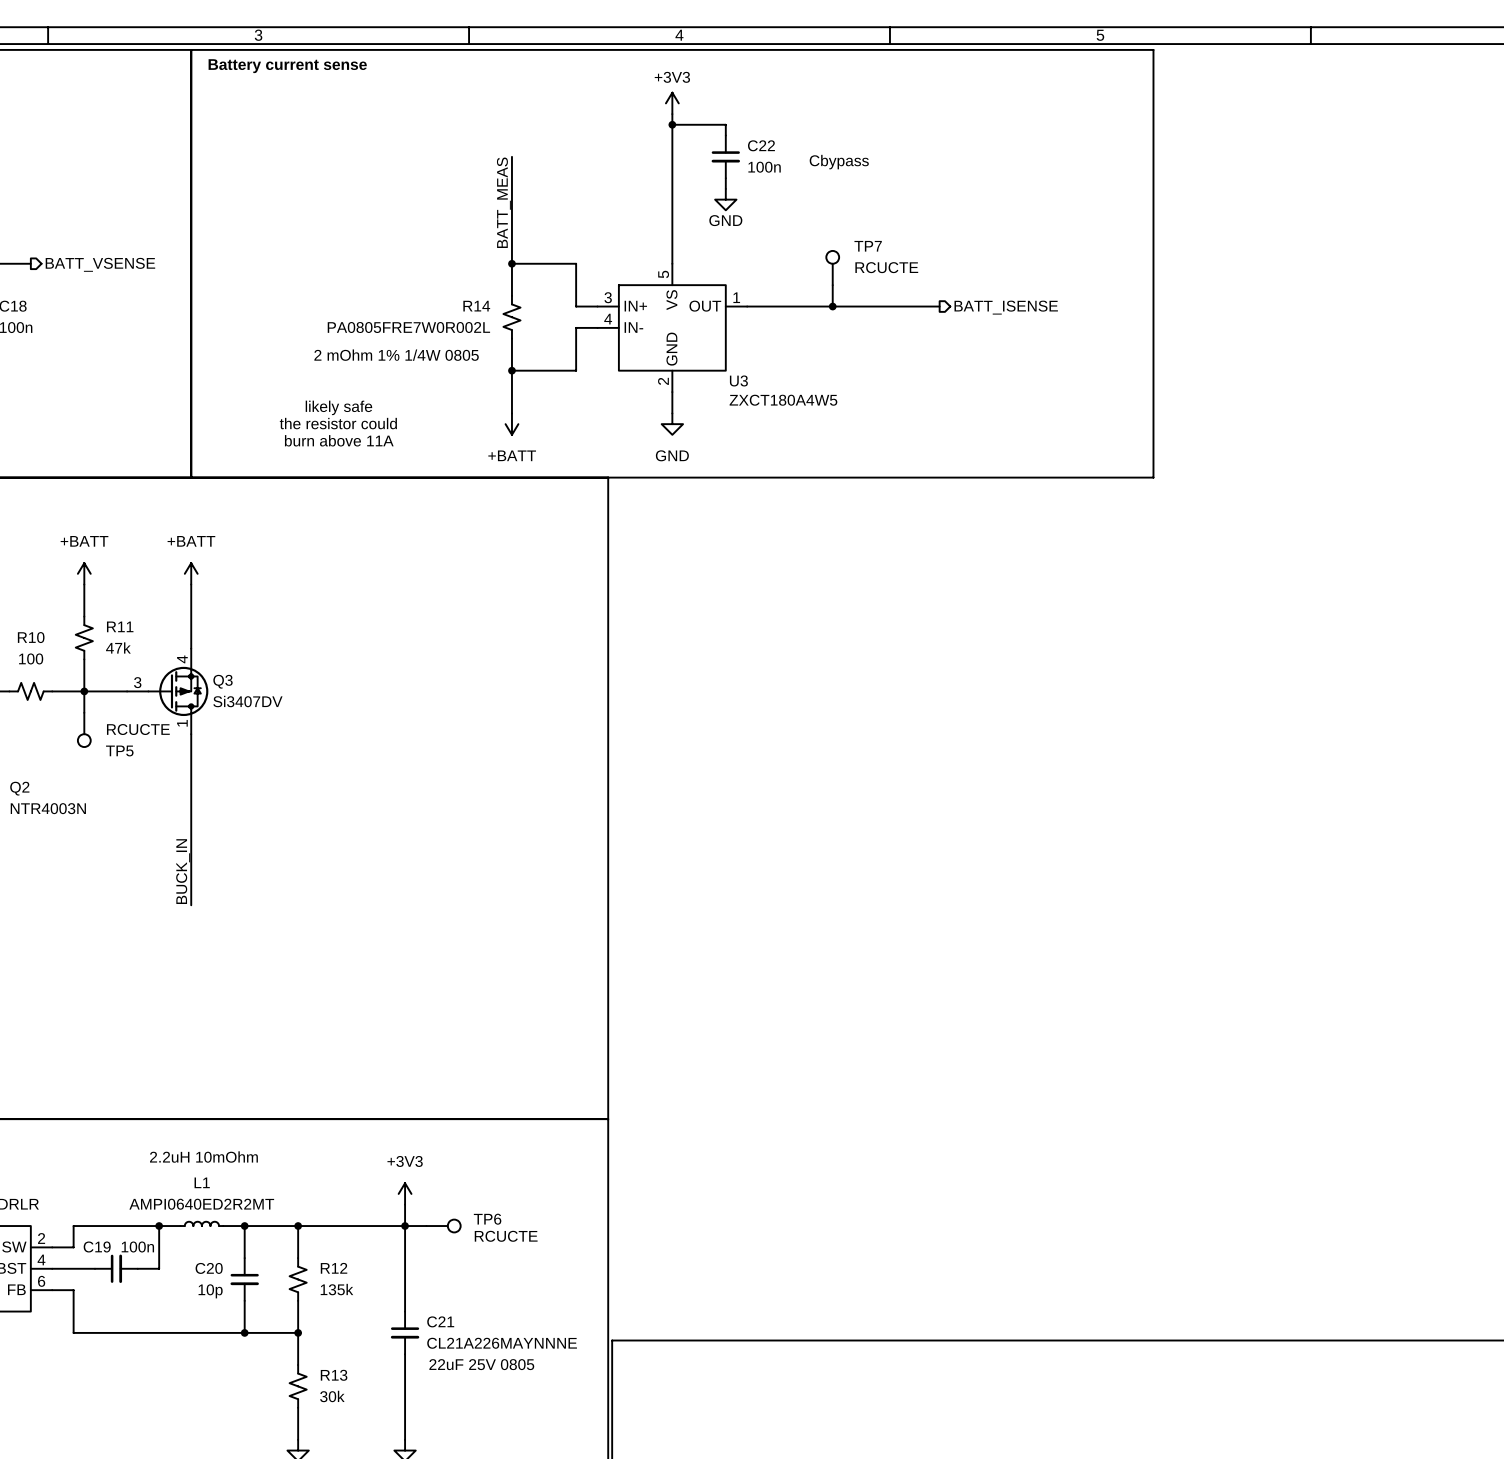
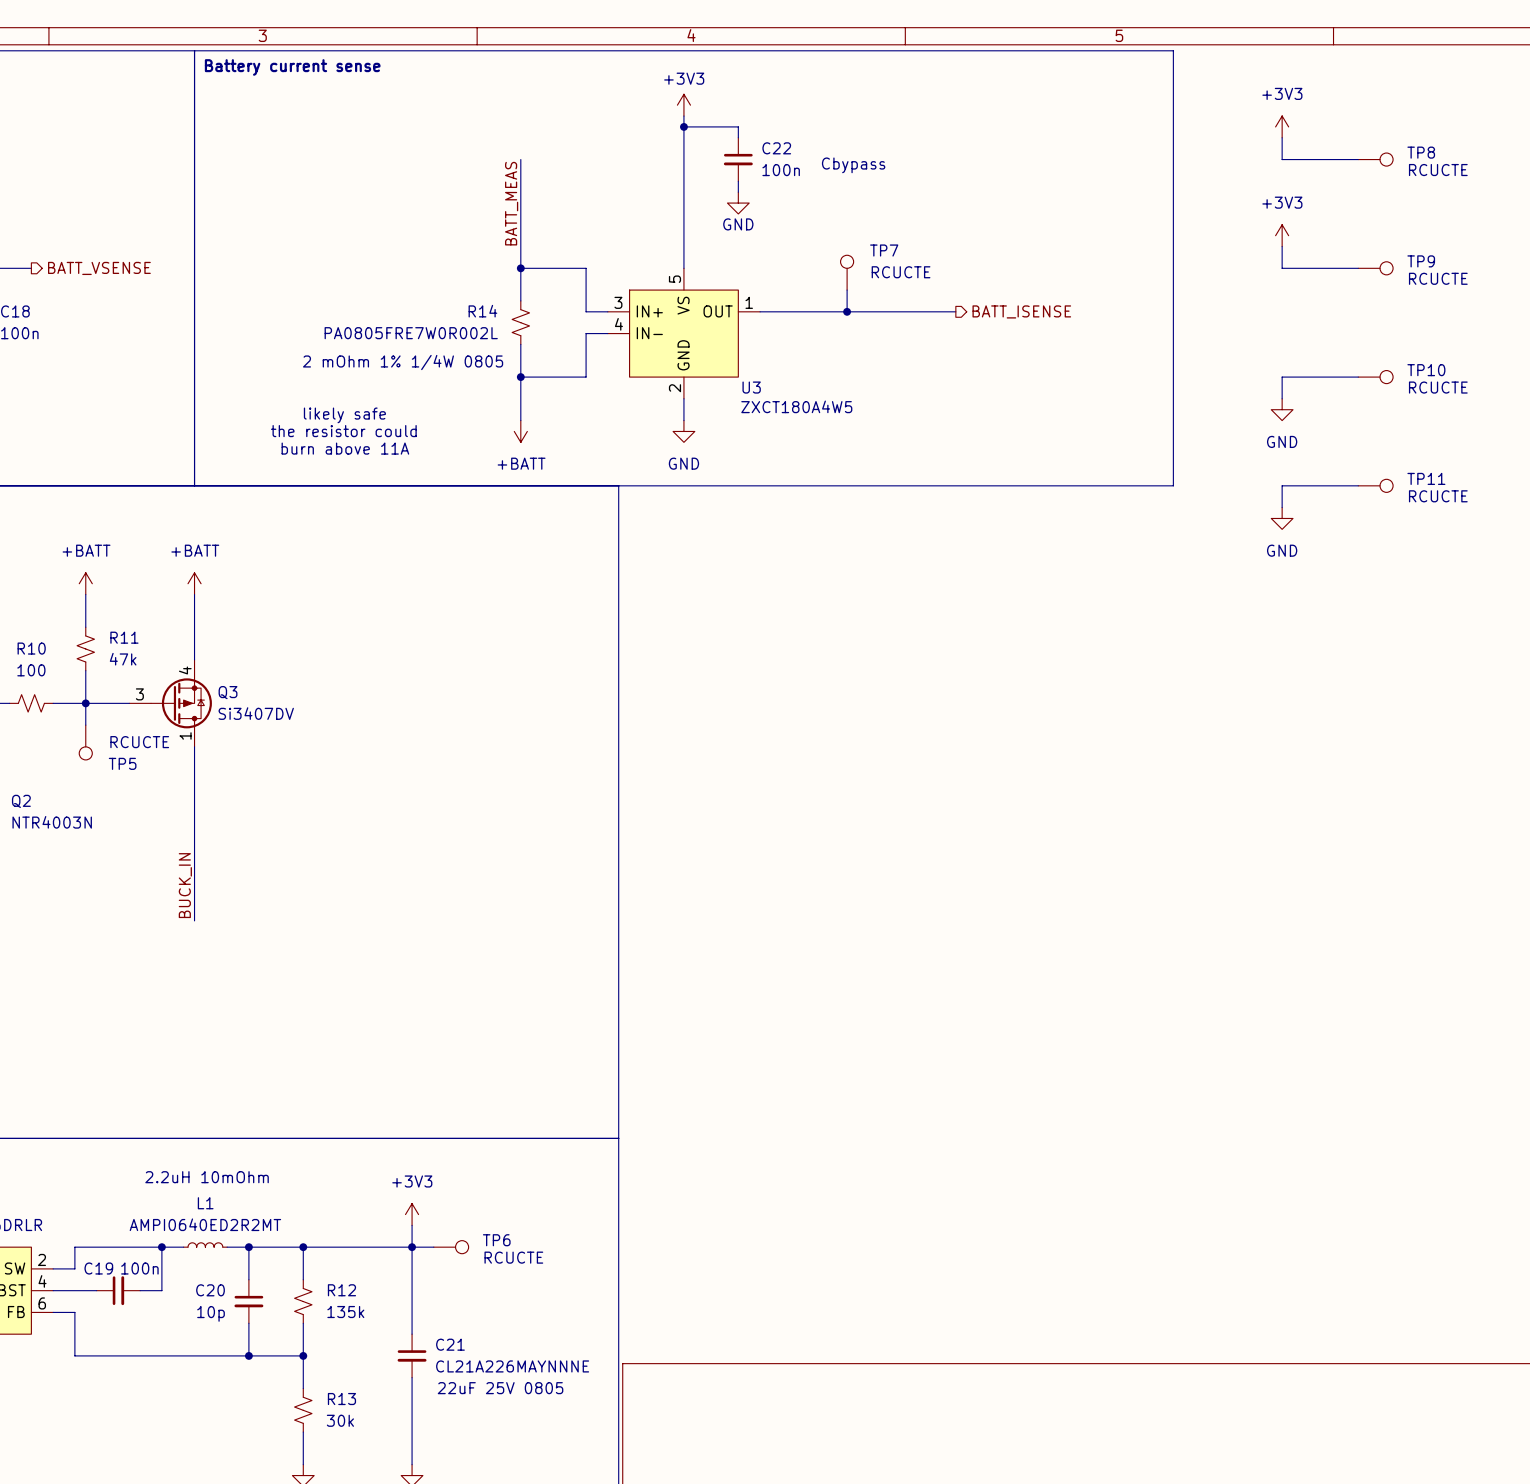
power symbol: none -> +3V3 (1282, 126)
wire: none -> (1282, 137) (1282, 159) (1358, 159)
TP8: none -> RCUCTE (1375, 159)
power symbol: none -> +3V3 (1282, 235)
wire: none -> (1282, 246) (1282, 268) (1358, 268)
TP9: none -> RCUCTE (1375, 268)
wire: none -> (1358, 377) (1282, 377) (1282, 398)
TP10: none -> RCUCTE (1375, 377)
power symbol: none -> GND (1282, 409)
wire: none -> (1358, 485) (1282, 485) (1282, 507)
TP11: none -> RCUCTE (1375, 485)
power symbol: none -> GND (1282, 518)

